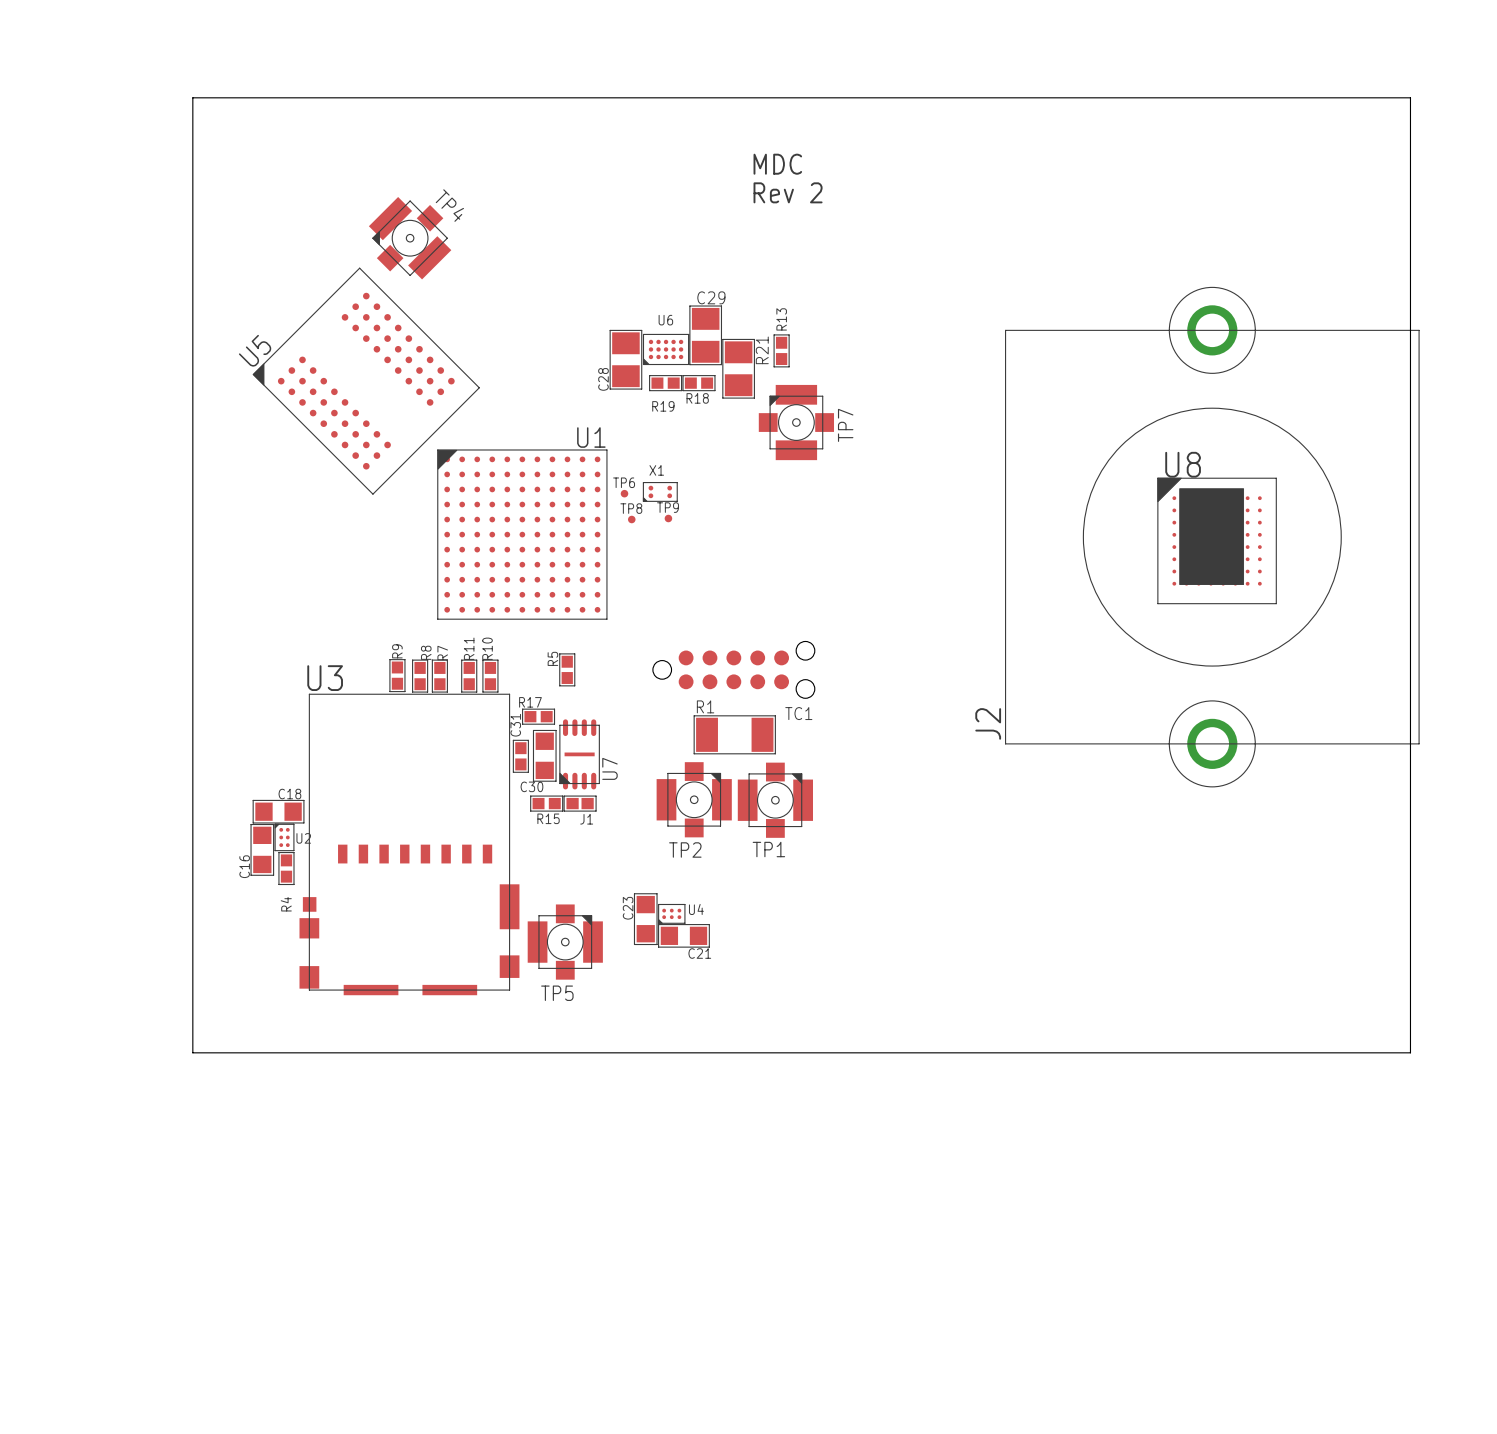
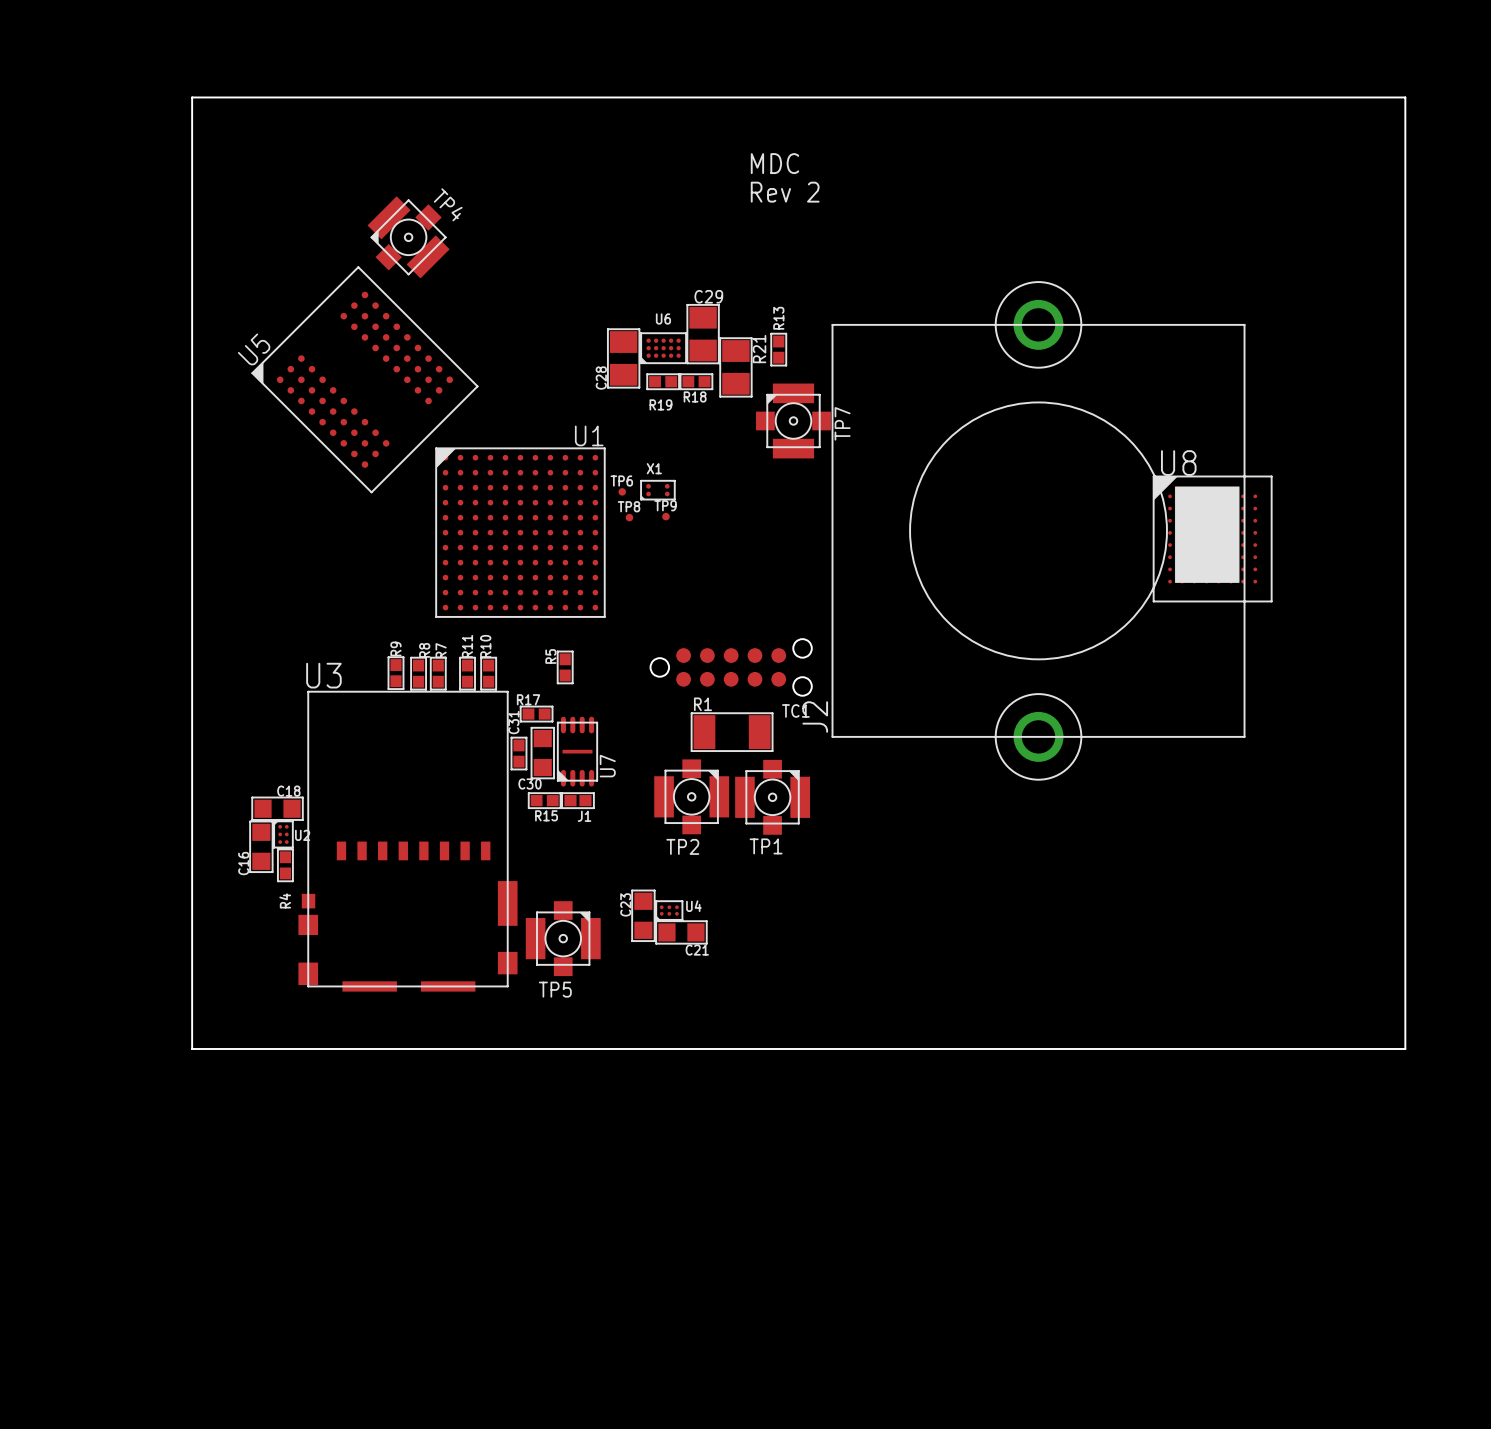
J2 position: (1212, 537) -> (1038, 530)

